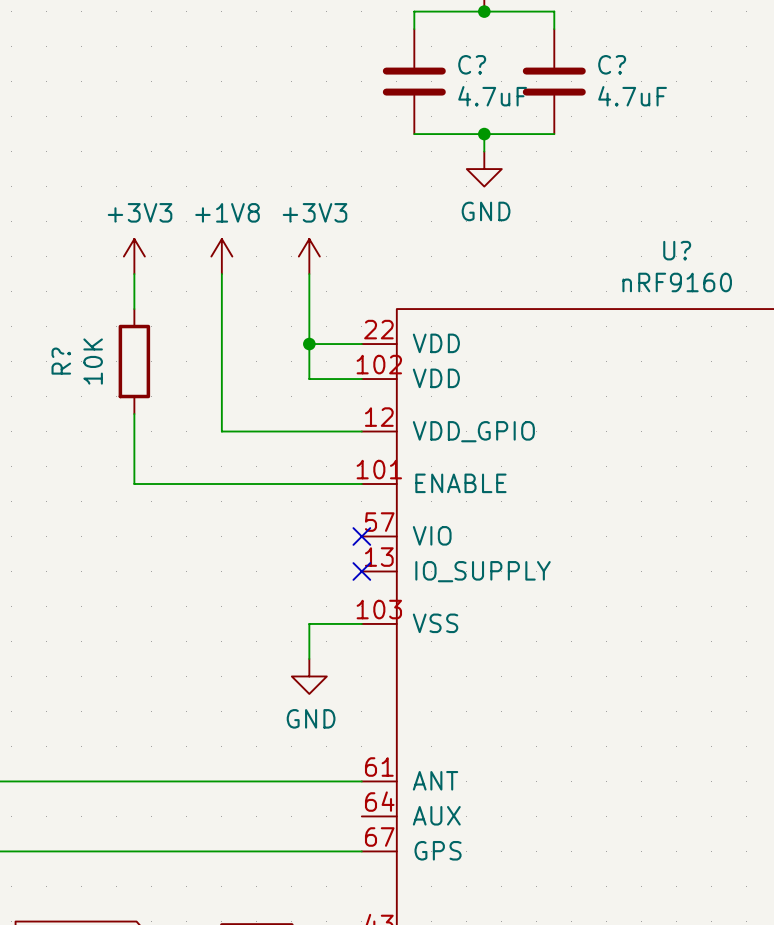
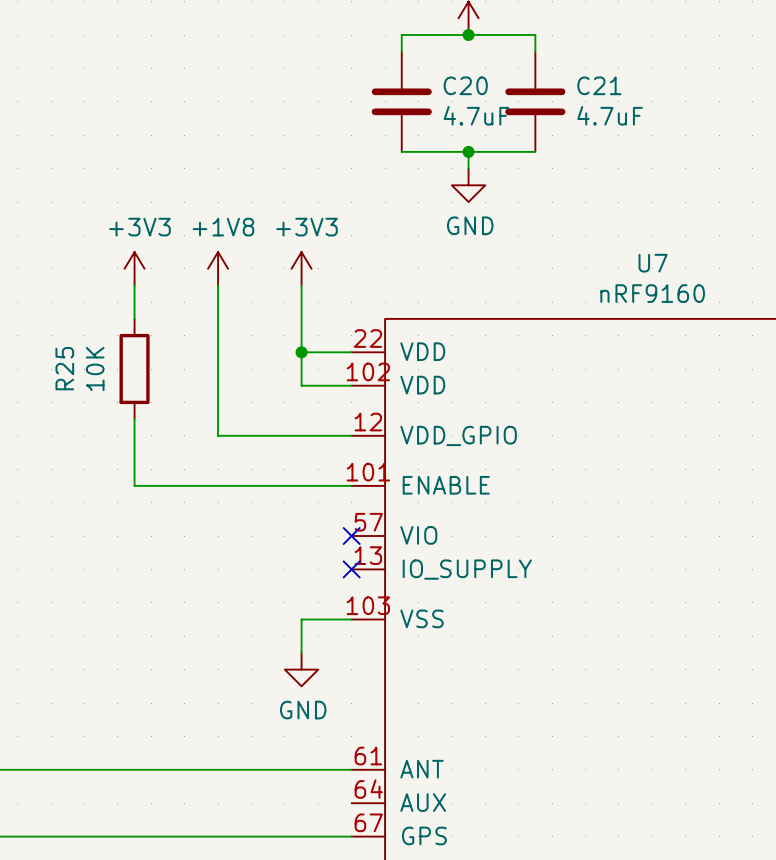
C? name: C? (472, 64) -> C20 (465, 85)
C? name: C? (612, 64) -> C21 (599, 85)
U? name: U? (677, 250) -> U7 (653, 263)
R? name: R? (61, 361) -> R25 (64, 368)

